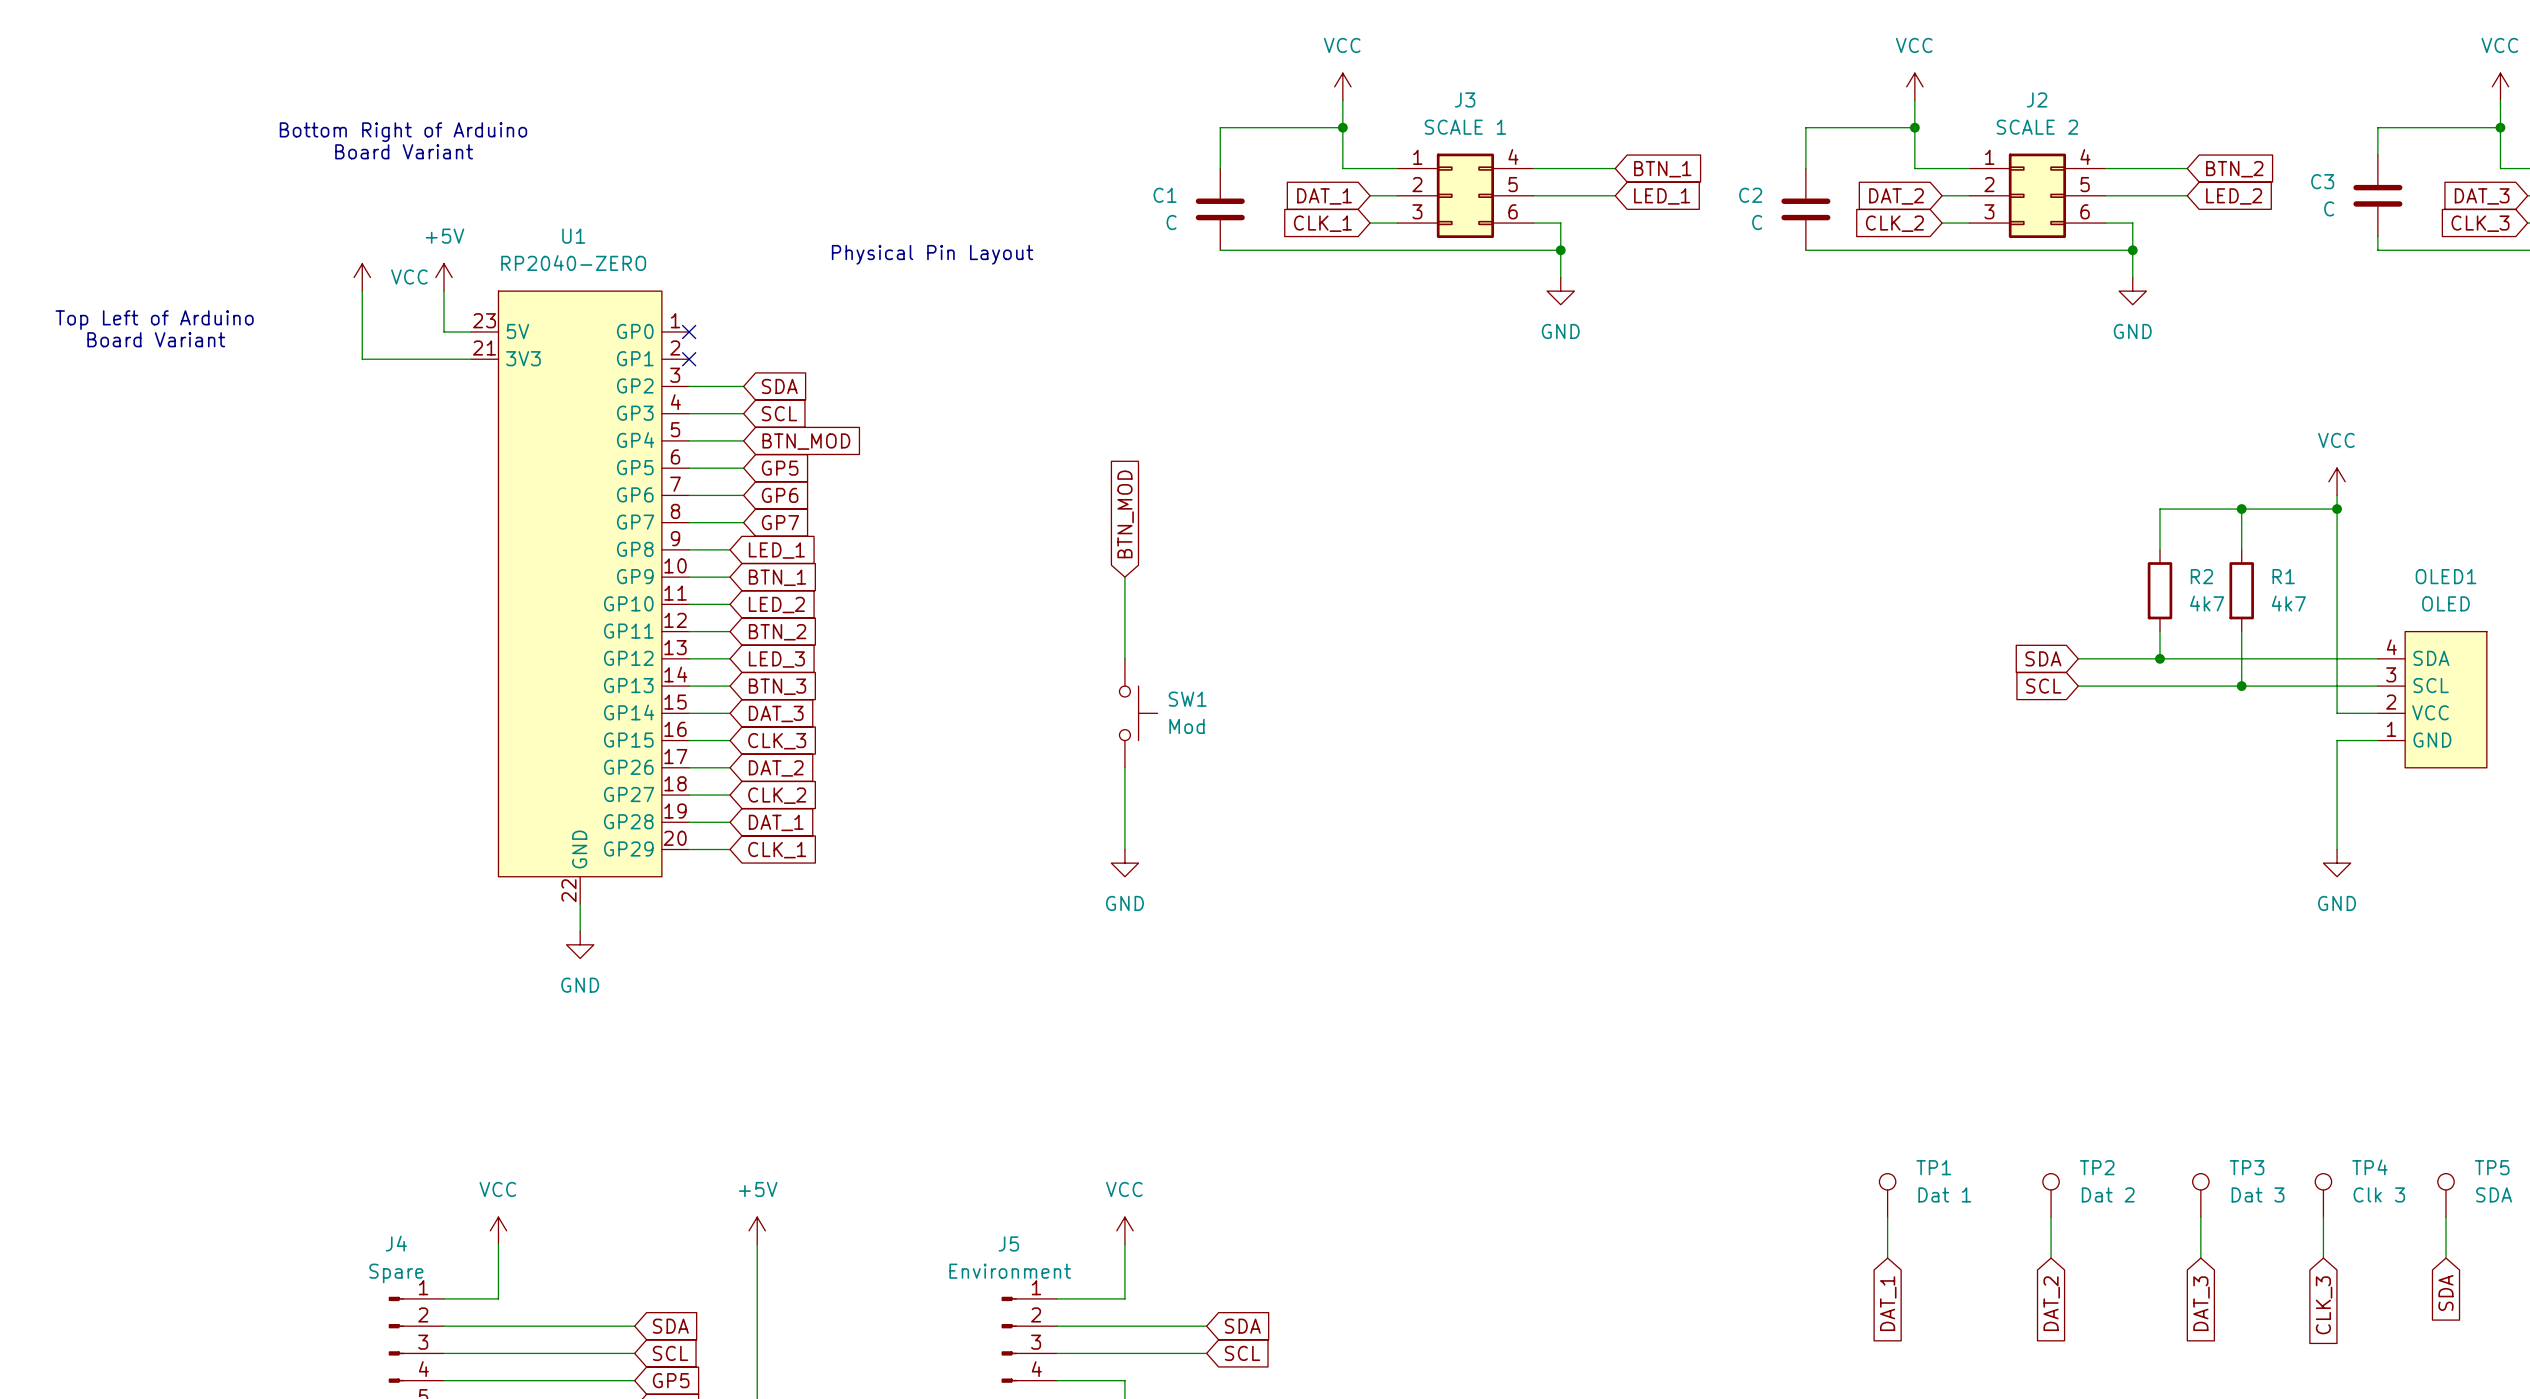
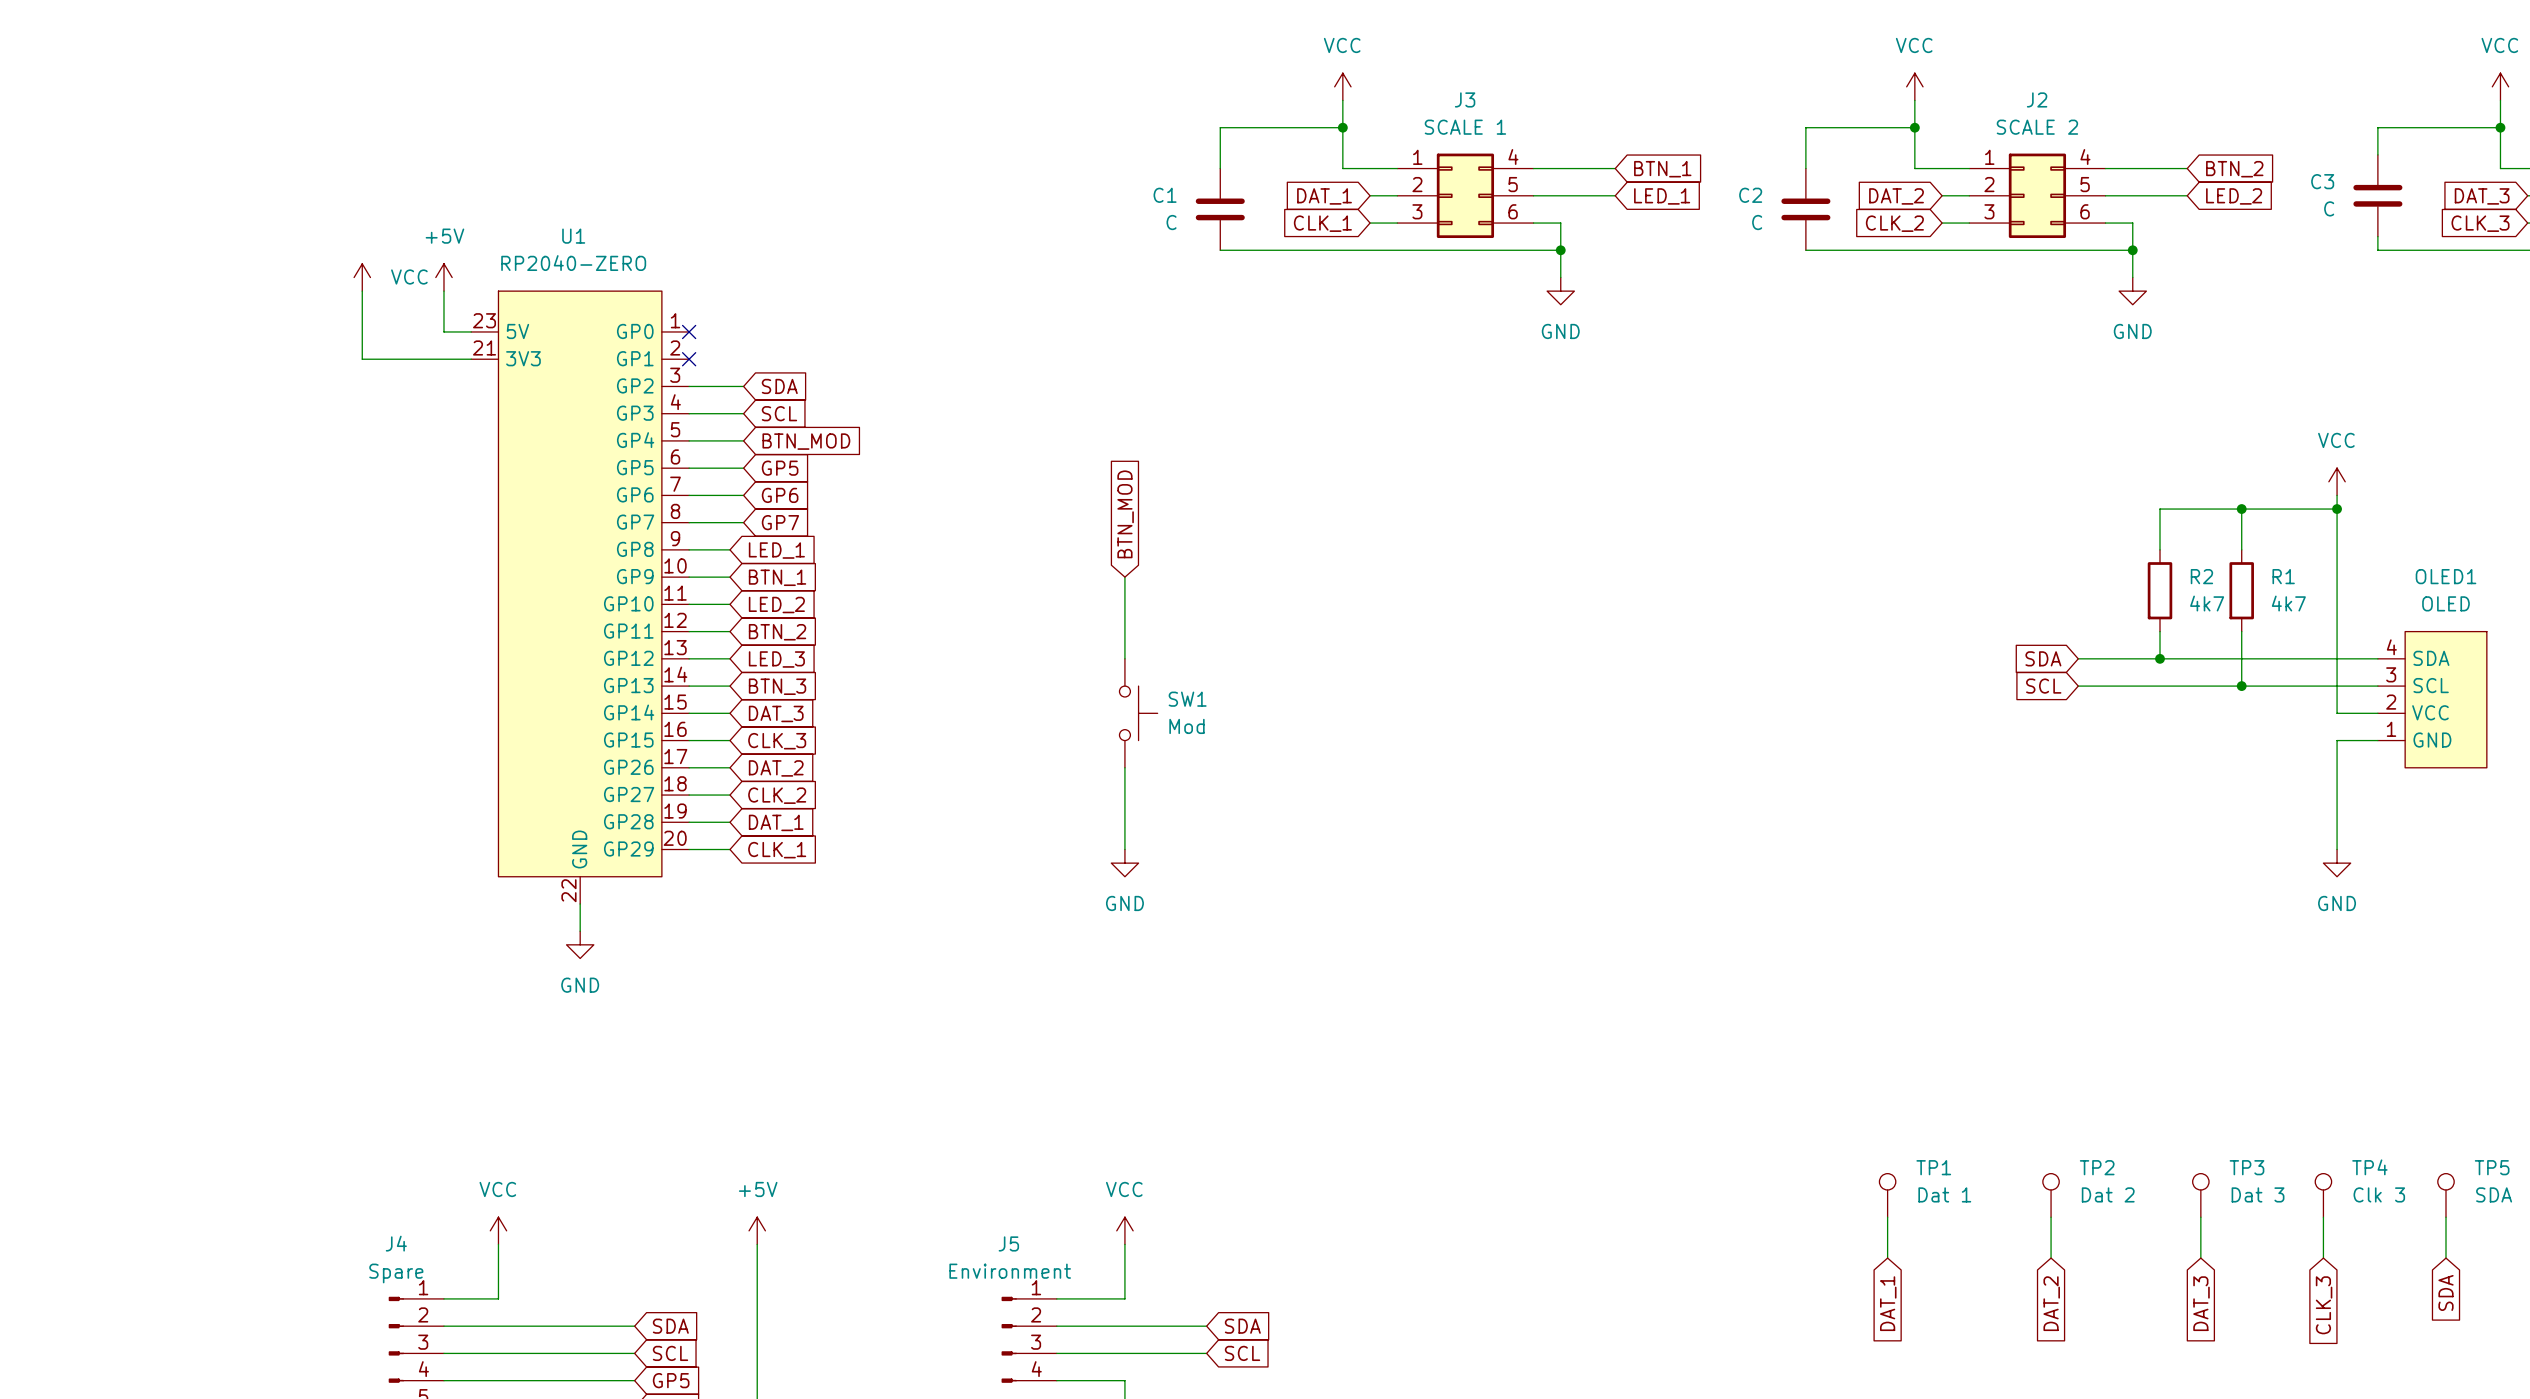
text: Bottom Right of Arduino (403, 132) -> none
text: Board Variant (404, 151) -> none
text: Physical Pin Layout (932, 254) -> none
text: Top Left of Arduino (154, 320) -> none
text: Board Variant (156, 339) -> none

